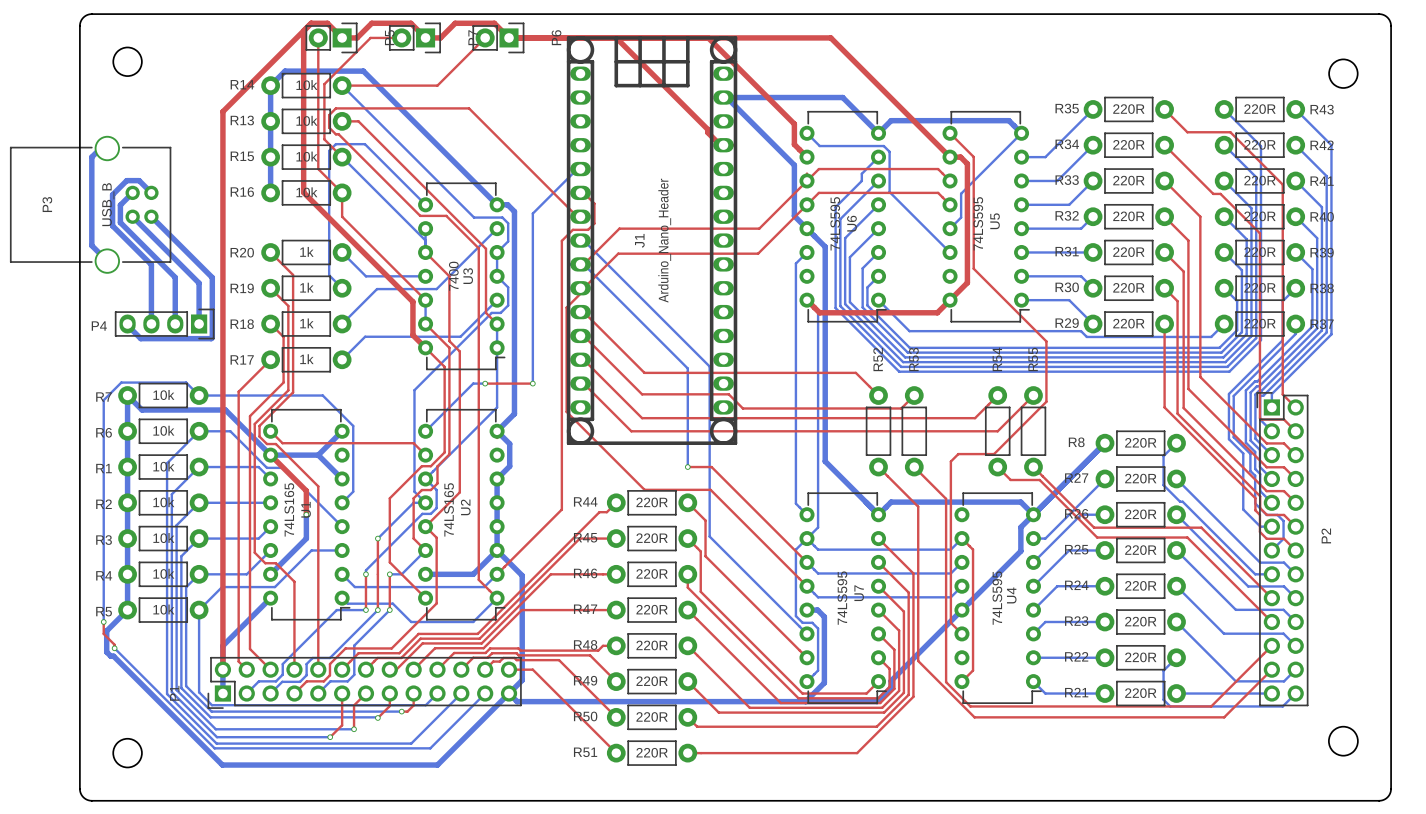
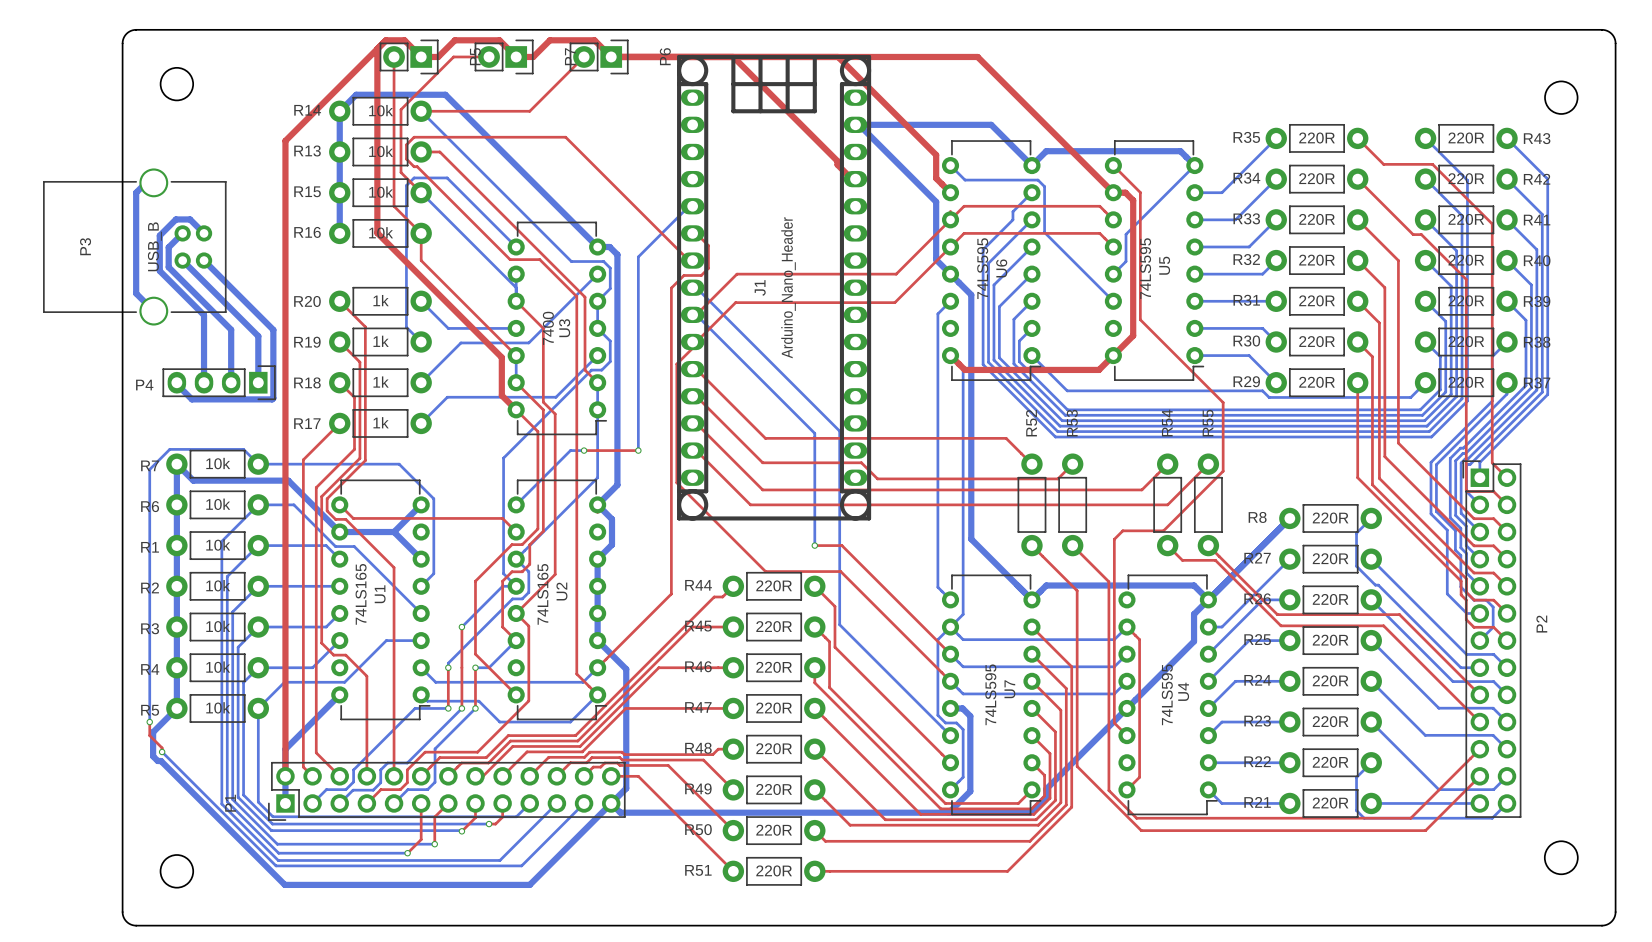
top track: (270, 455) (306, 490) (306, 514) -> none
bottom track: (306, 514) (306, 538) (270, 574) -> none
via: (306, 514) -> none
bottom track: (497, 550) (473, 574) (425, 574) -> none

